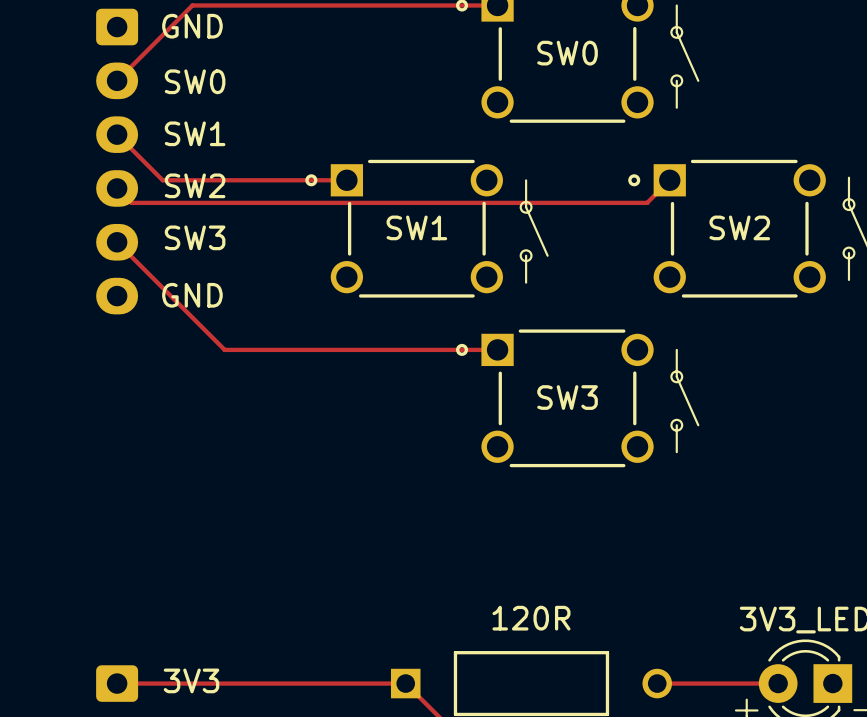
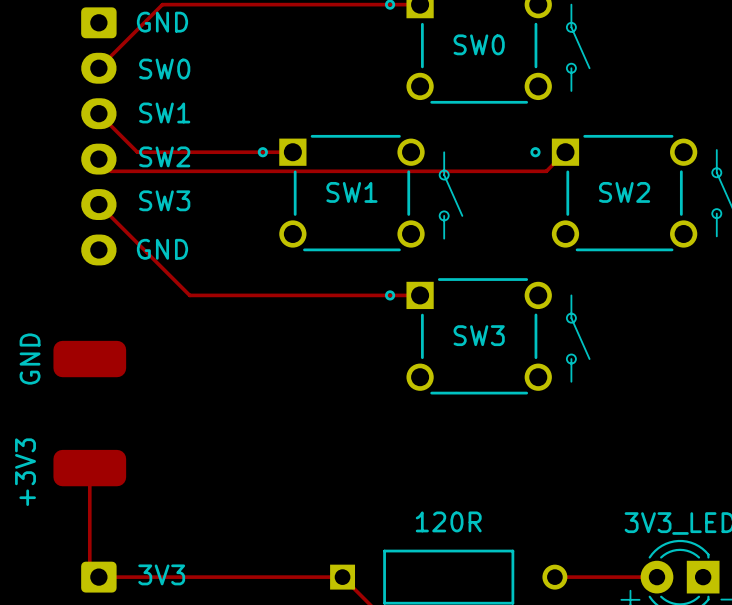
GND: none -> (89, 359)
top track: none -> (89, 468) (89, 568)
+3V3: none -> (89, 468)

